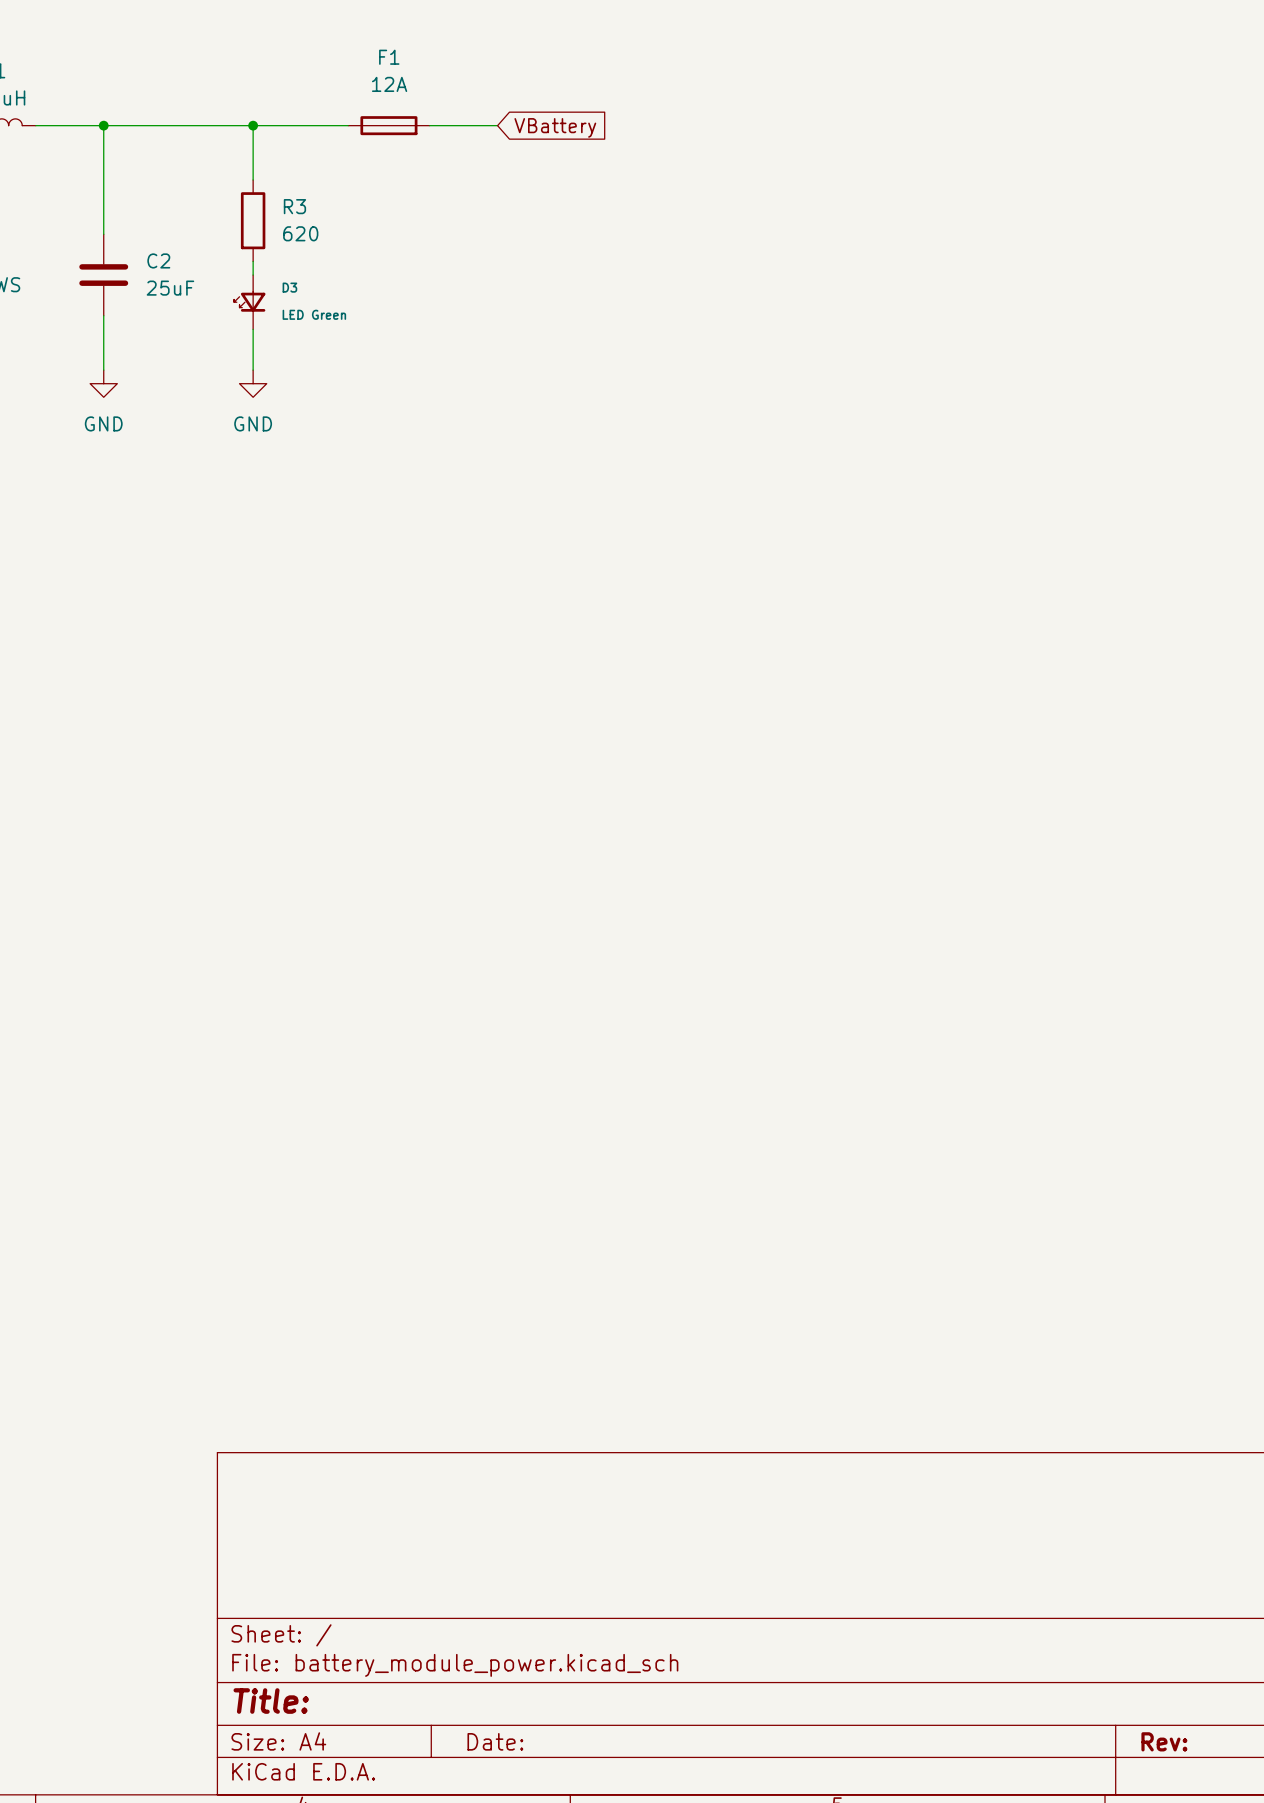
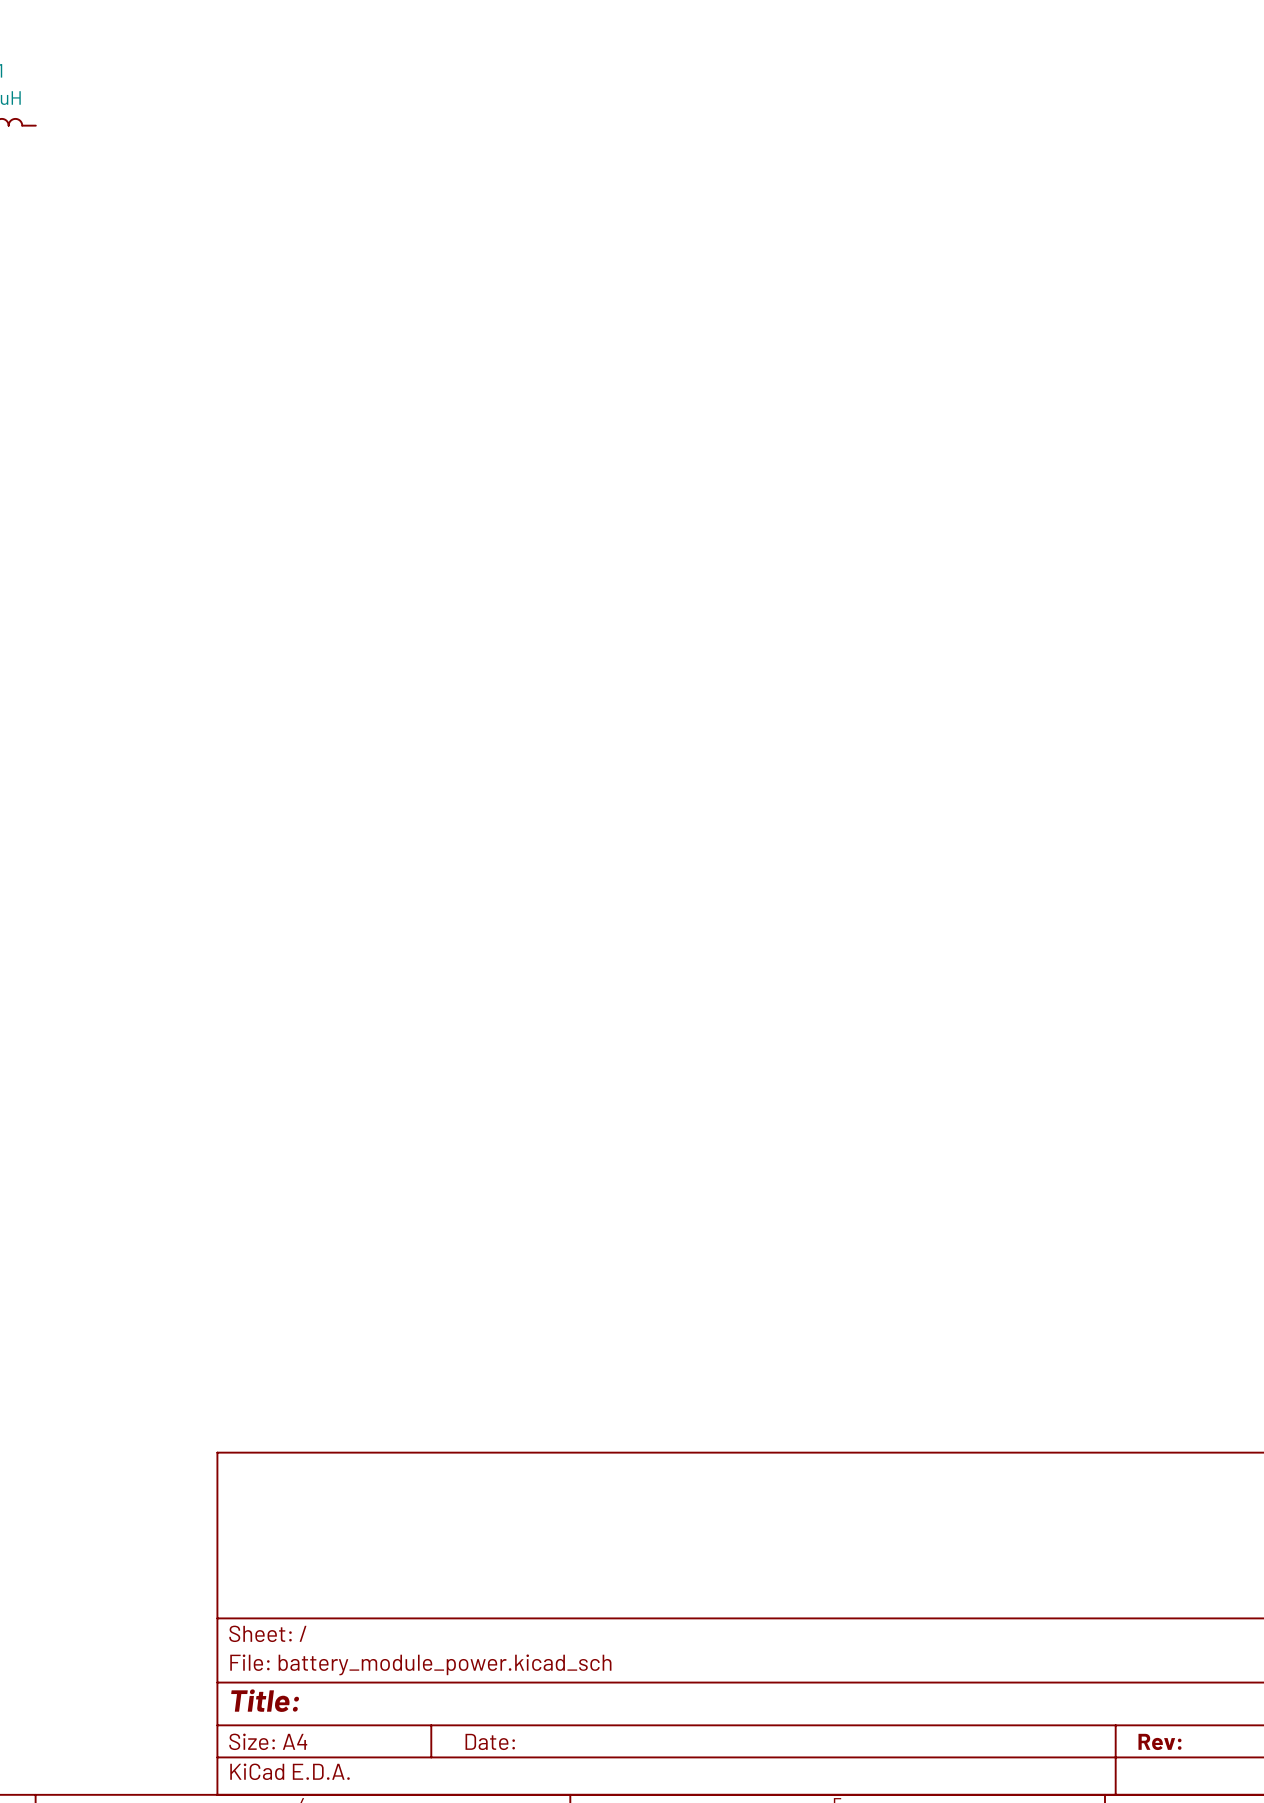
wire: (35, 125) (348, 125) -> none
wire: (103, 125) (103, 234) -> none
junction: (103, 125) -> none
wire: (253, 125) (253, 179) -> none
junction: (253, 125) -> none
F1: 12A (388, 125) -> none
wire: (429, 125) (497, 125) -> none
global label: VBattery (555, 127) -> none
R3: 620 (253, 220) -> none
wire: (253, 261) (253, 275) -> none
C2: 25uF (103, 275) -> none
D3: LED Green (249, 302) -> none
wire: (103, 315) (103, 370) -> none
wire: (253, 329) (253, 370) -> none
power symbol: GND (103, 383) -> none
power symbol: GND (253, 383) -> none

